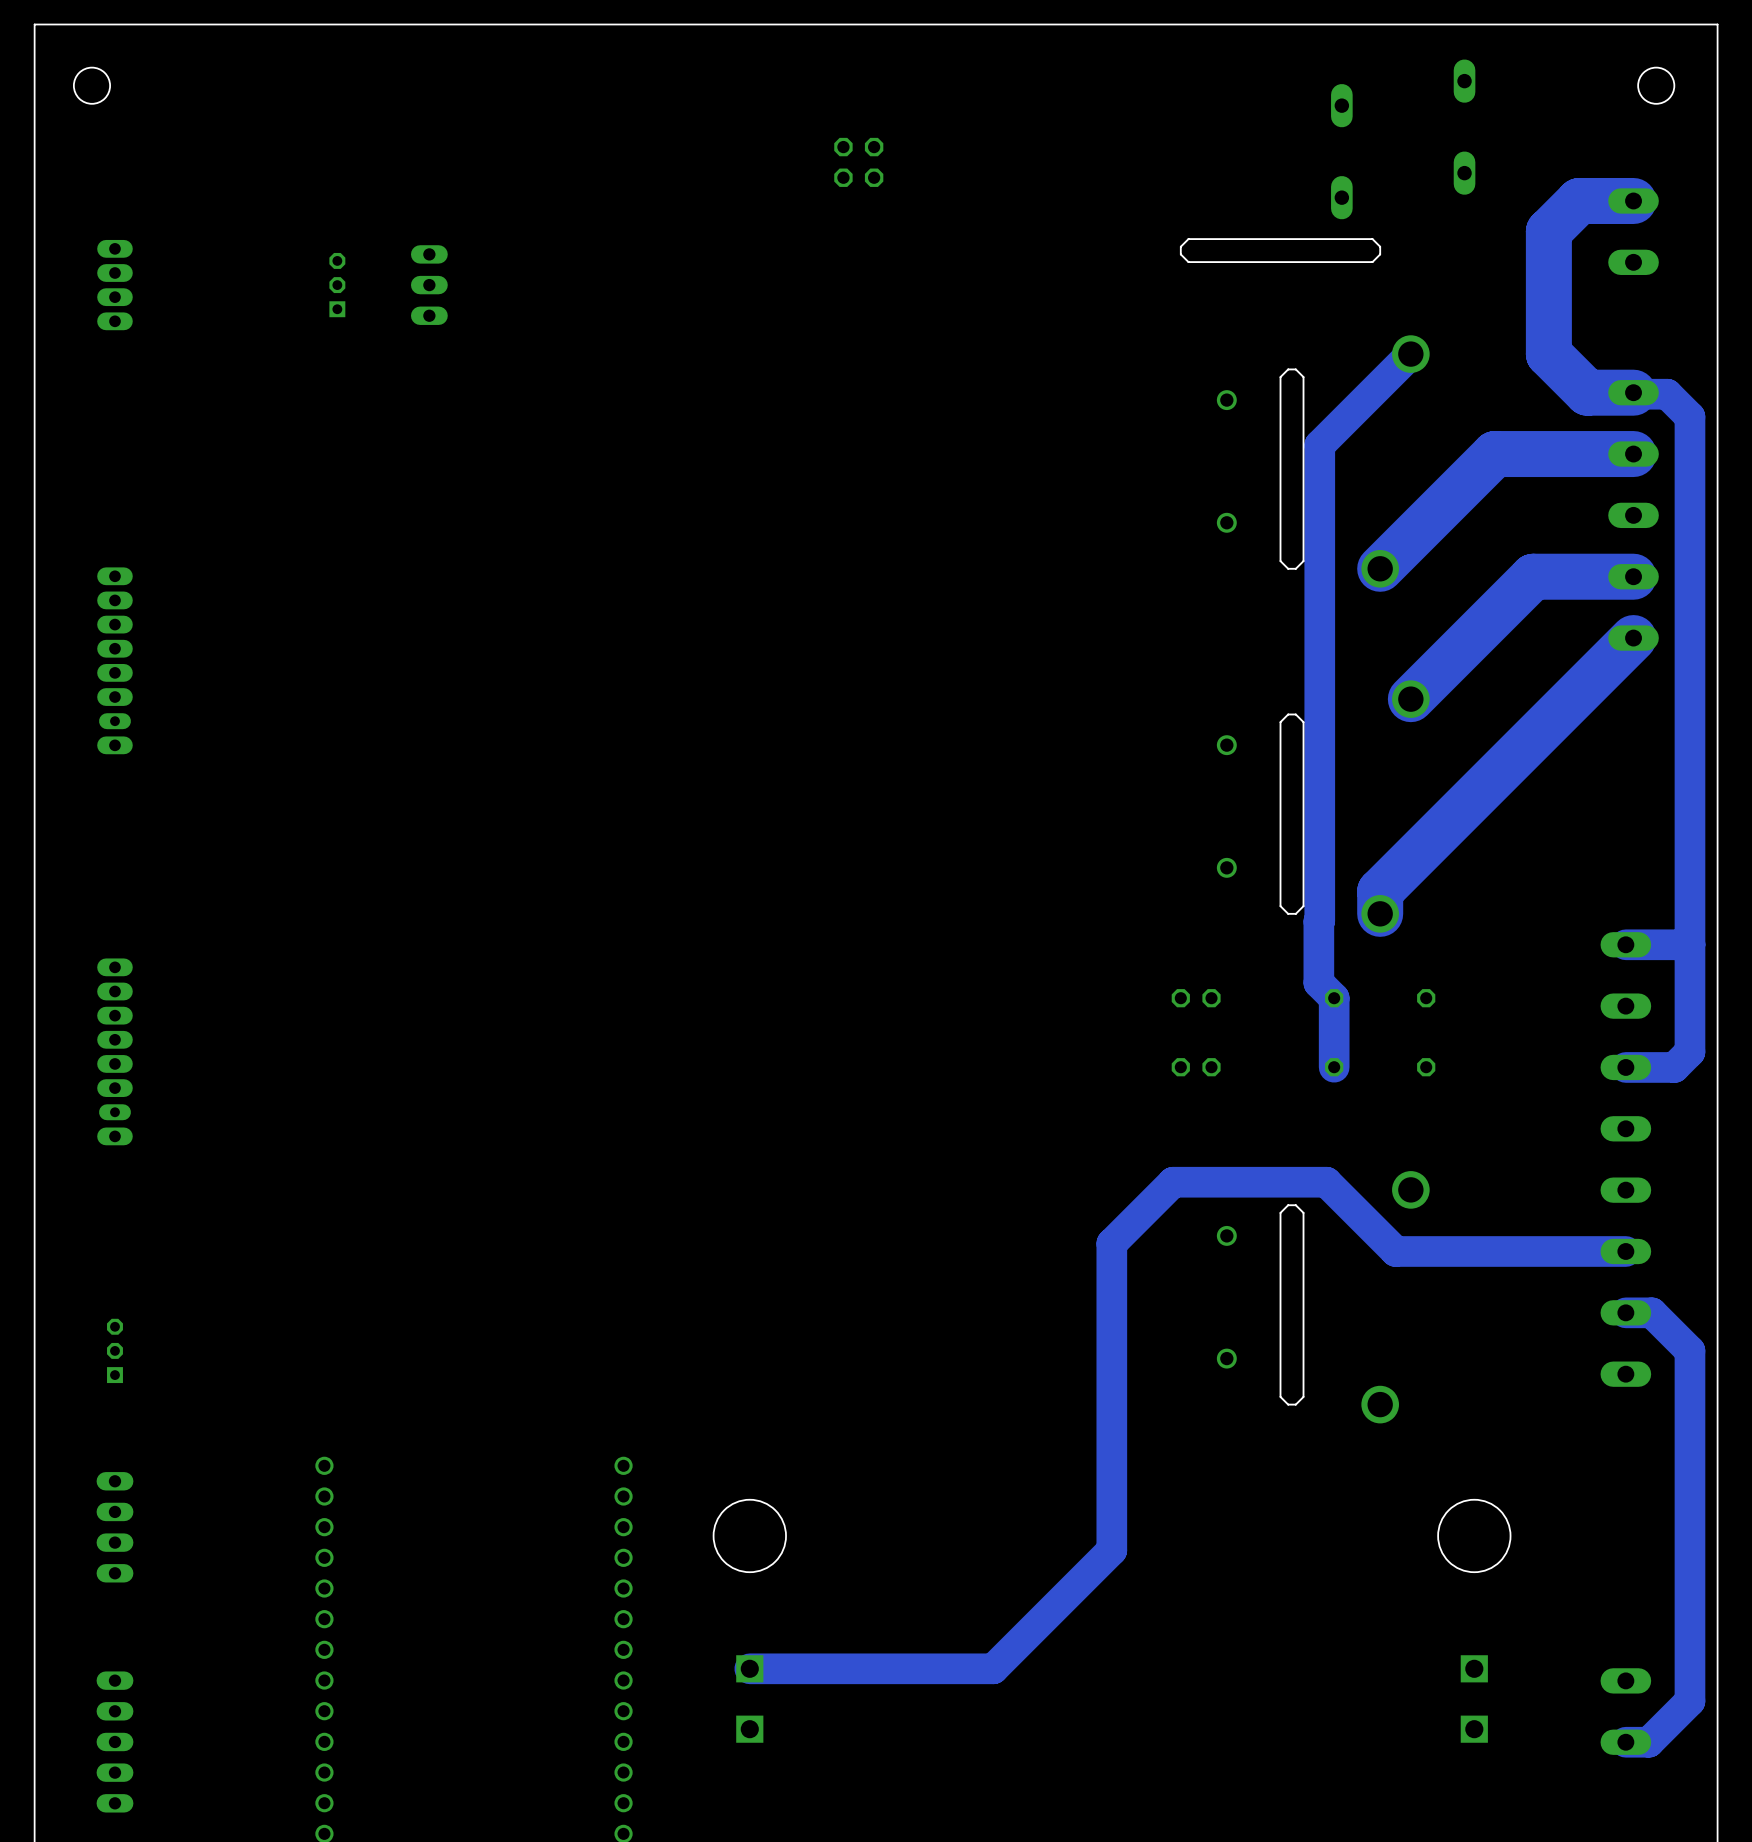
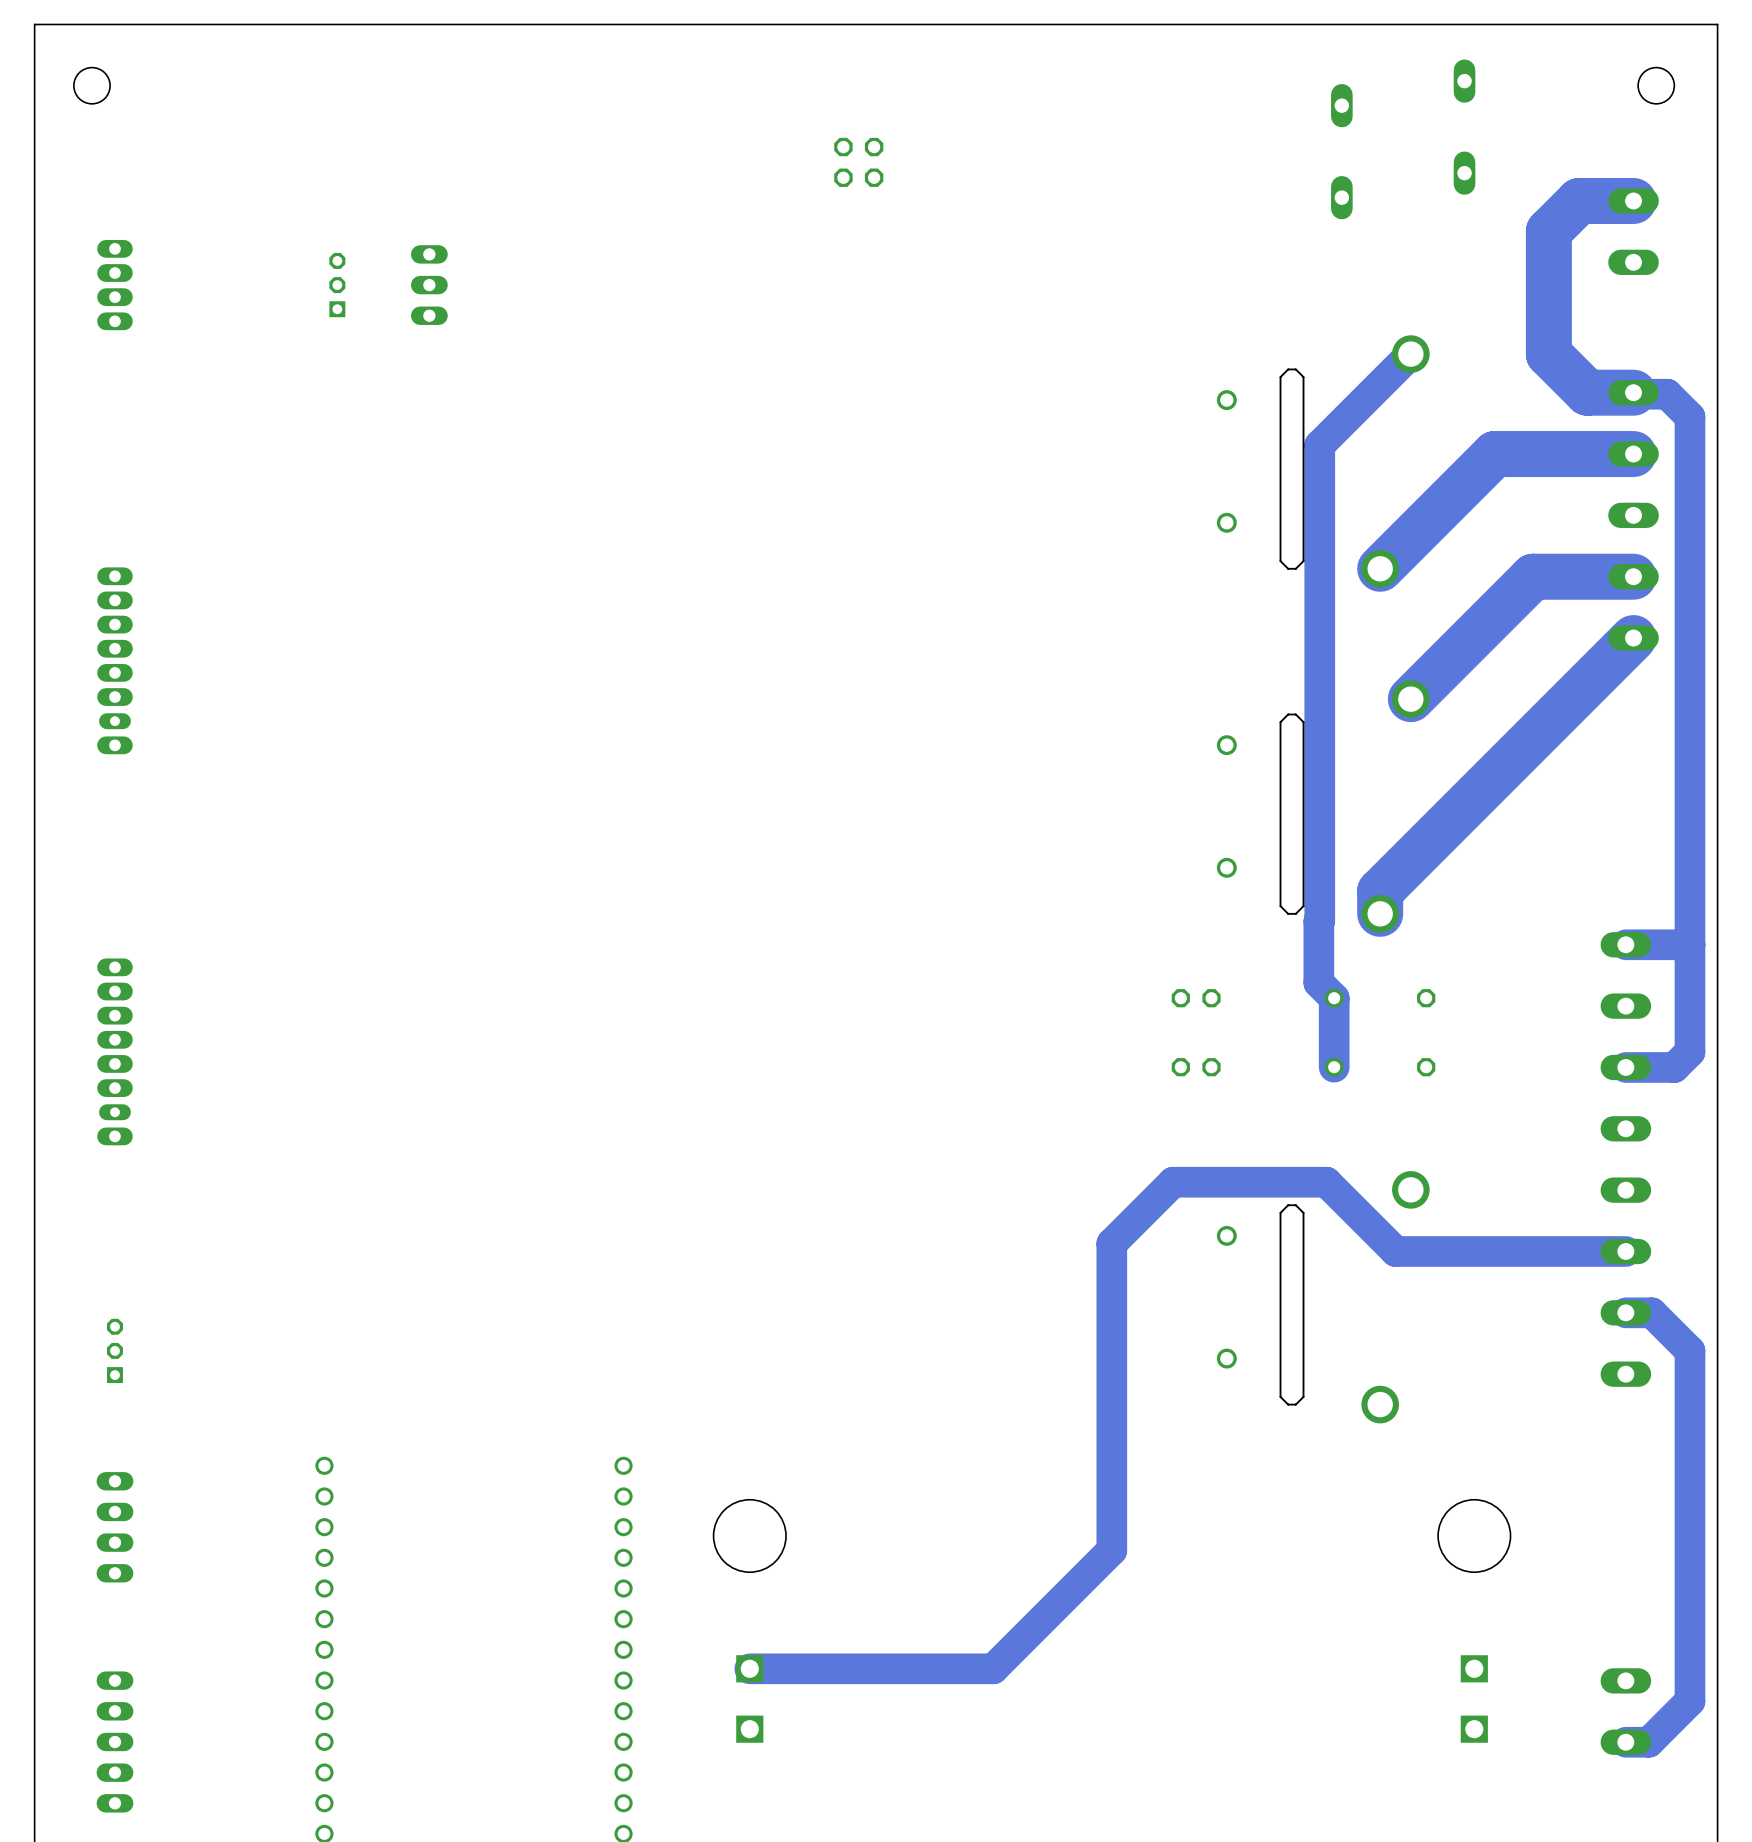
board edge: (1372, 239) (1380, 246) (1380, 254) (1372, 262) (1188, 262) (1180, 254) (1180, 246) (1188, 239) (1372, 239) -> none

